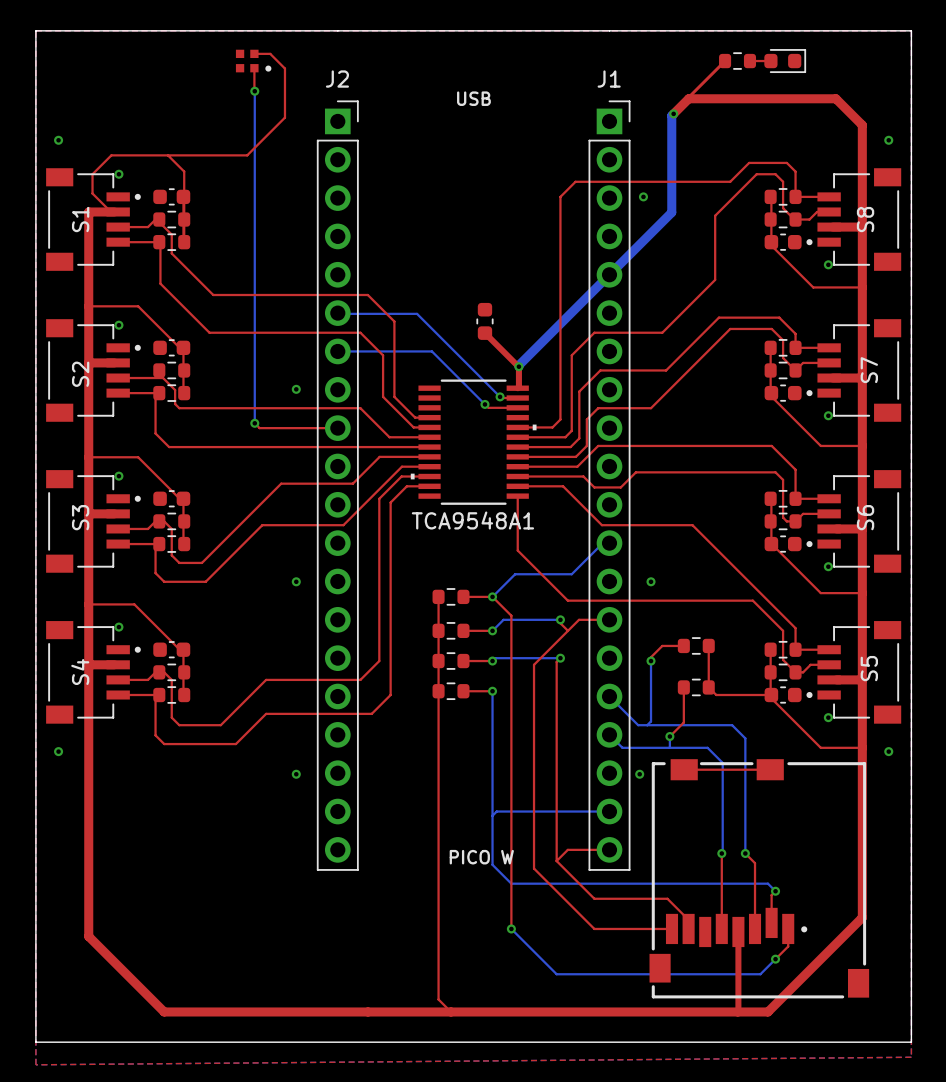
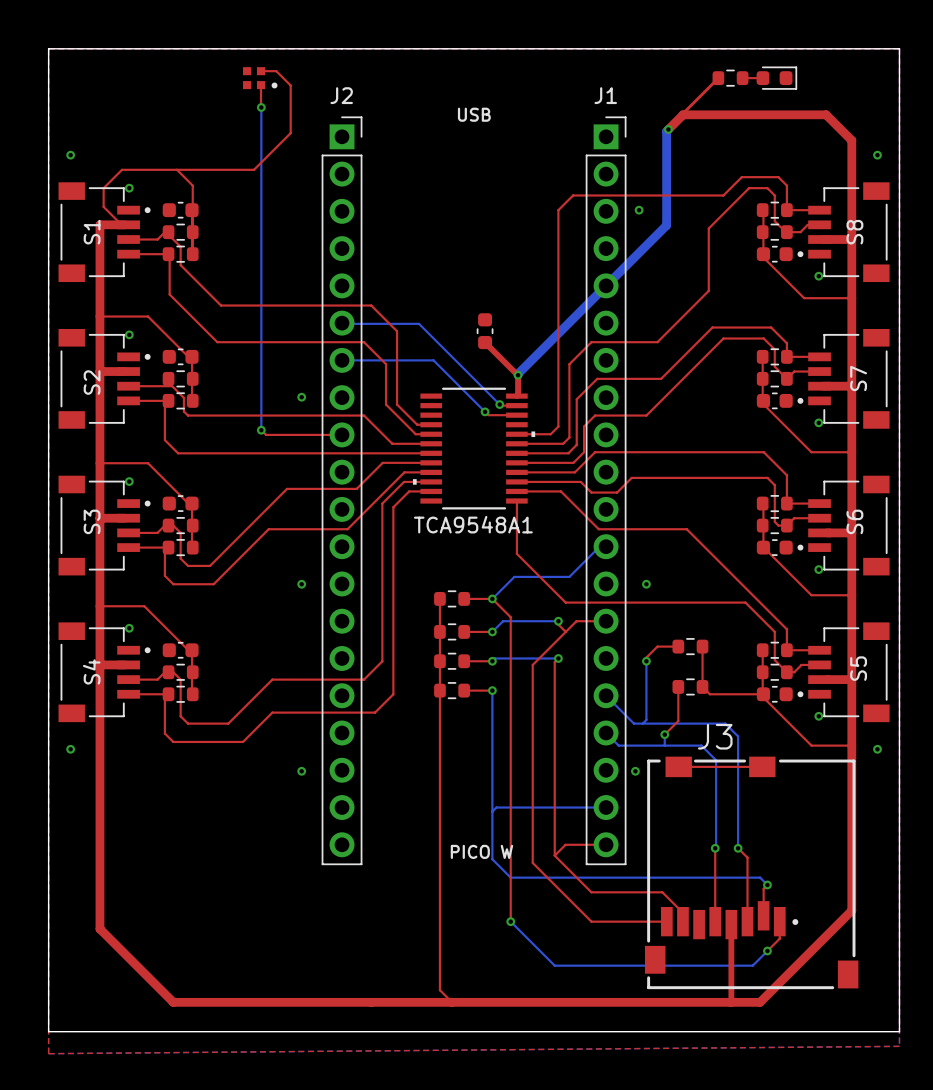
J3 name: none -> J3 (715, 736)

